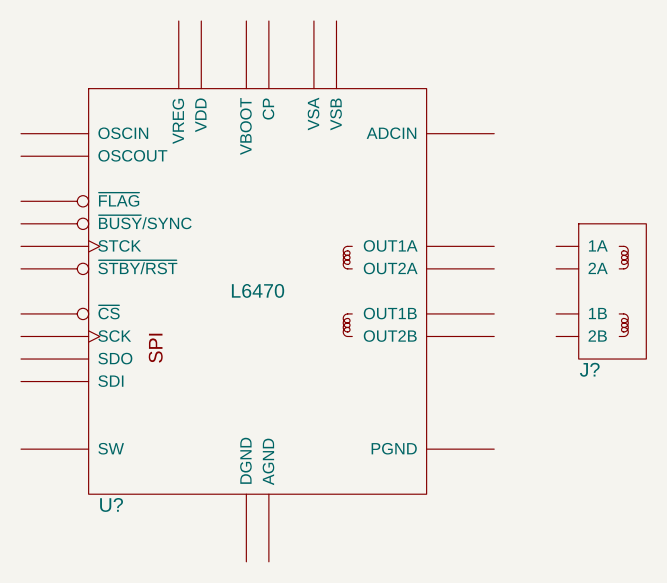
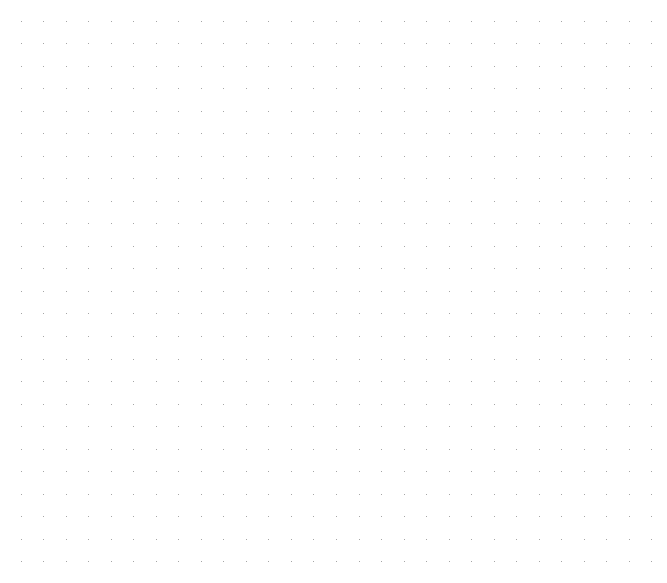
U?: L6470 (257, 291) -> none
J?: (601, 291) -> none

